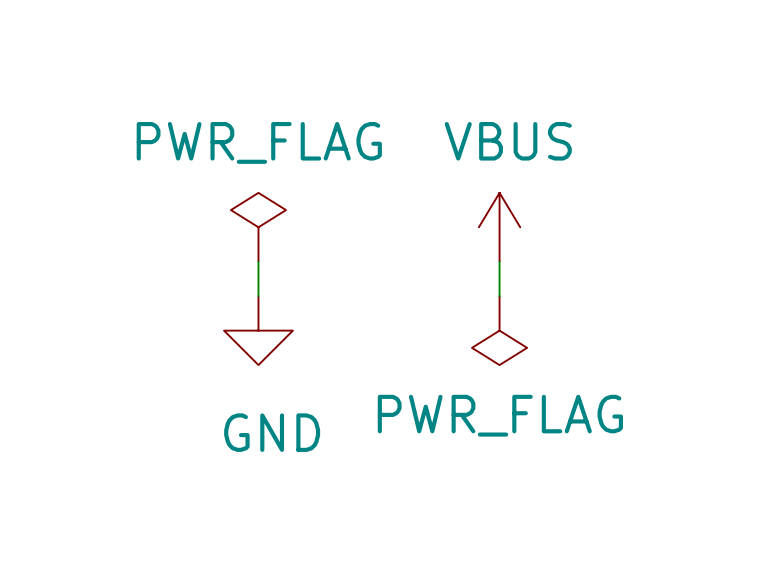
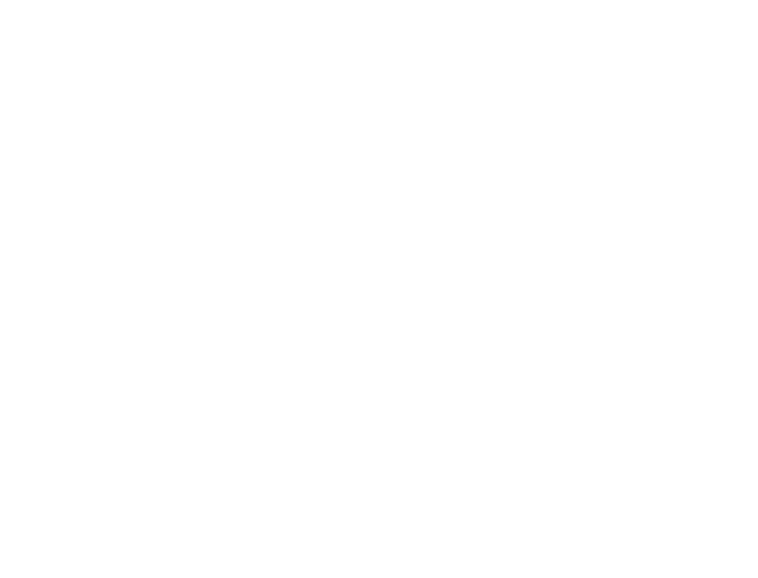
power symbol: PWR_FLAG (258, 227) -> none
power symbol: VBUS (499, 227) -> none
wire: (258, 261) (258, 296) -> none
wire: (499, 261) (499, 296) -> none
power symbol: GND (258, 330) -> none
power symbol: PWR_FLAG (499, 330) -> none

